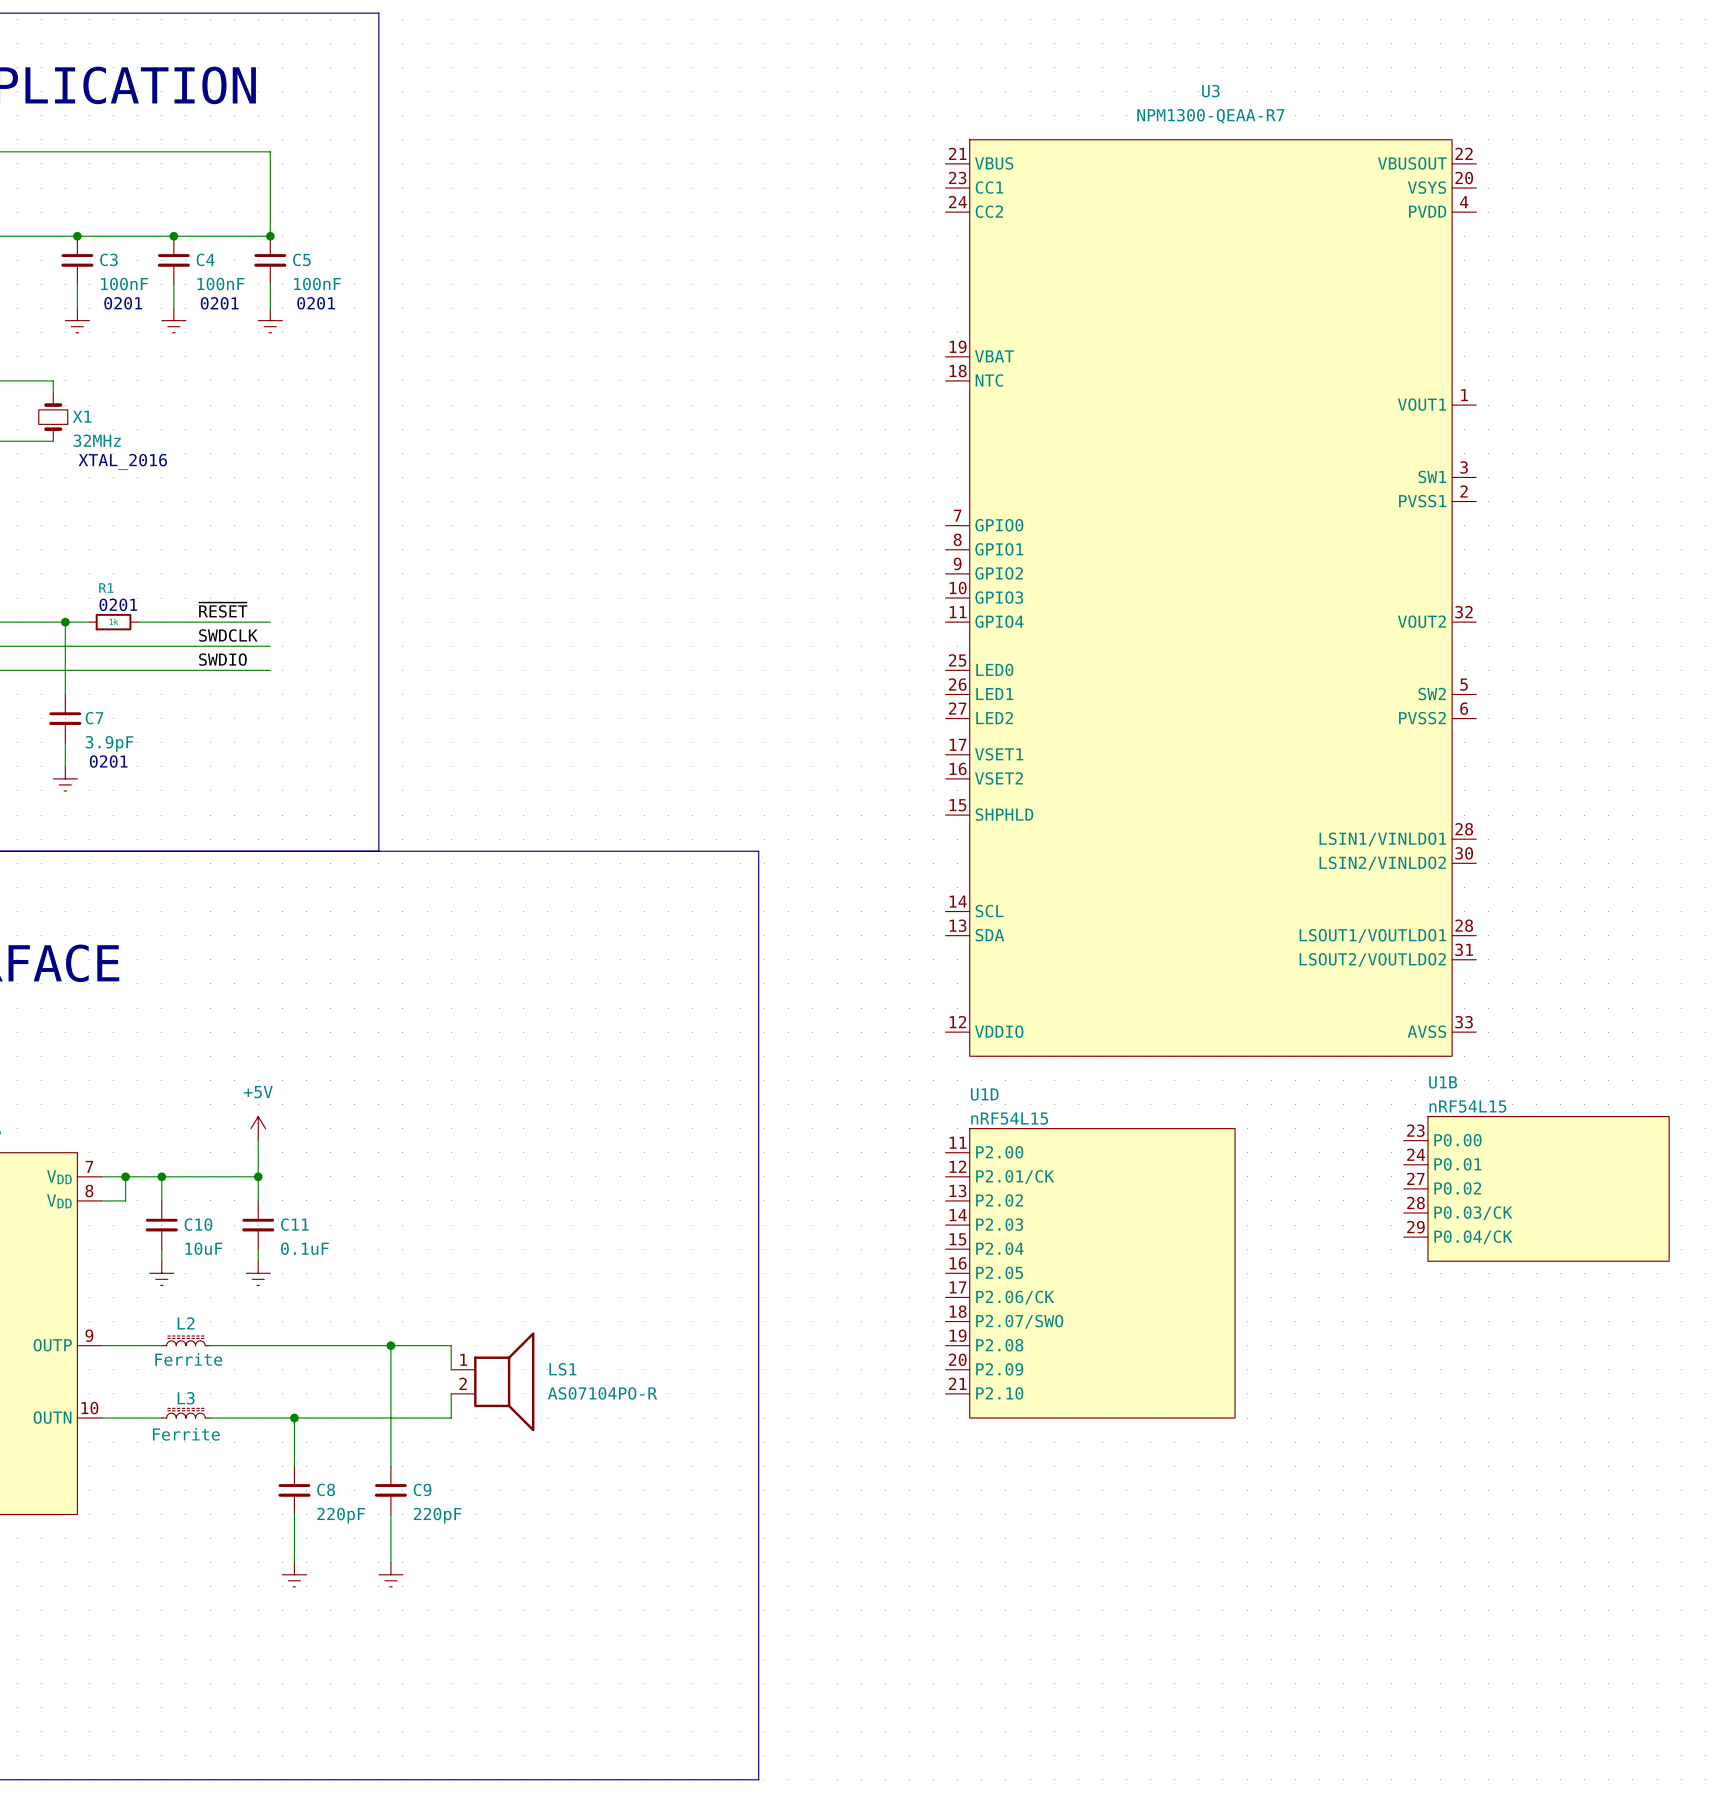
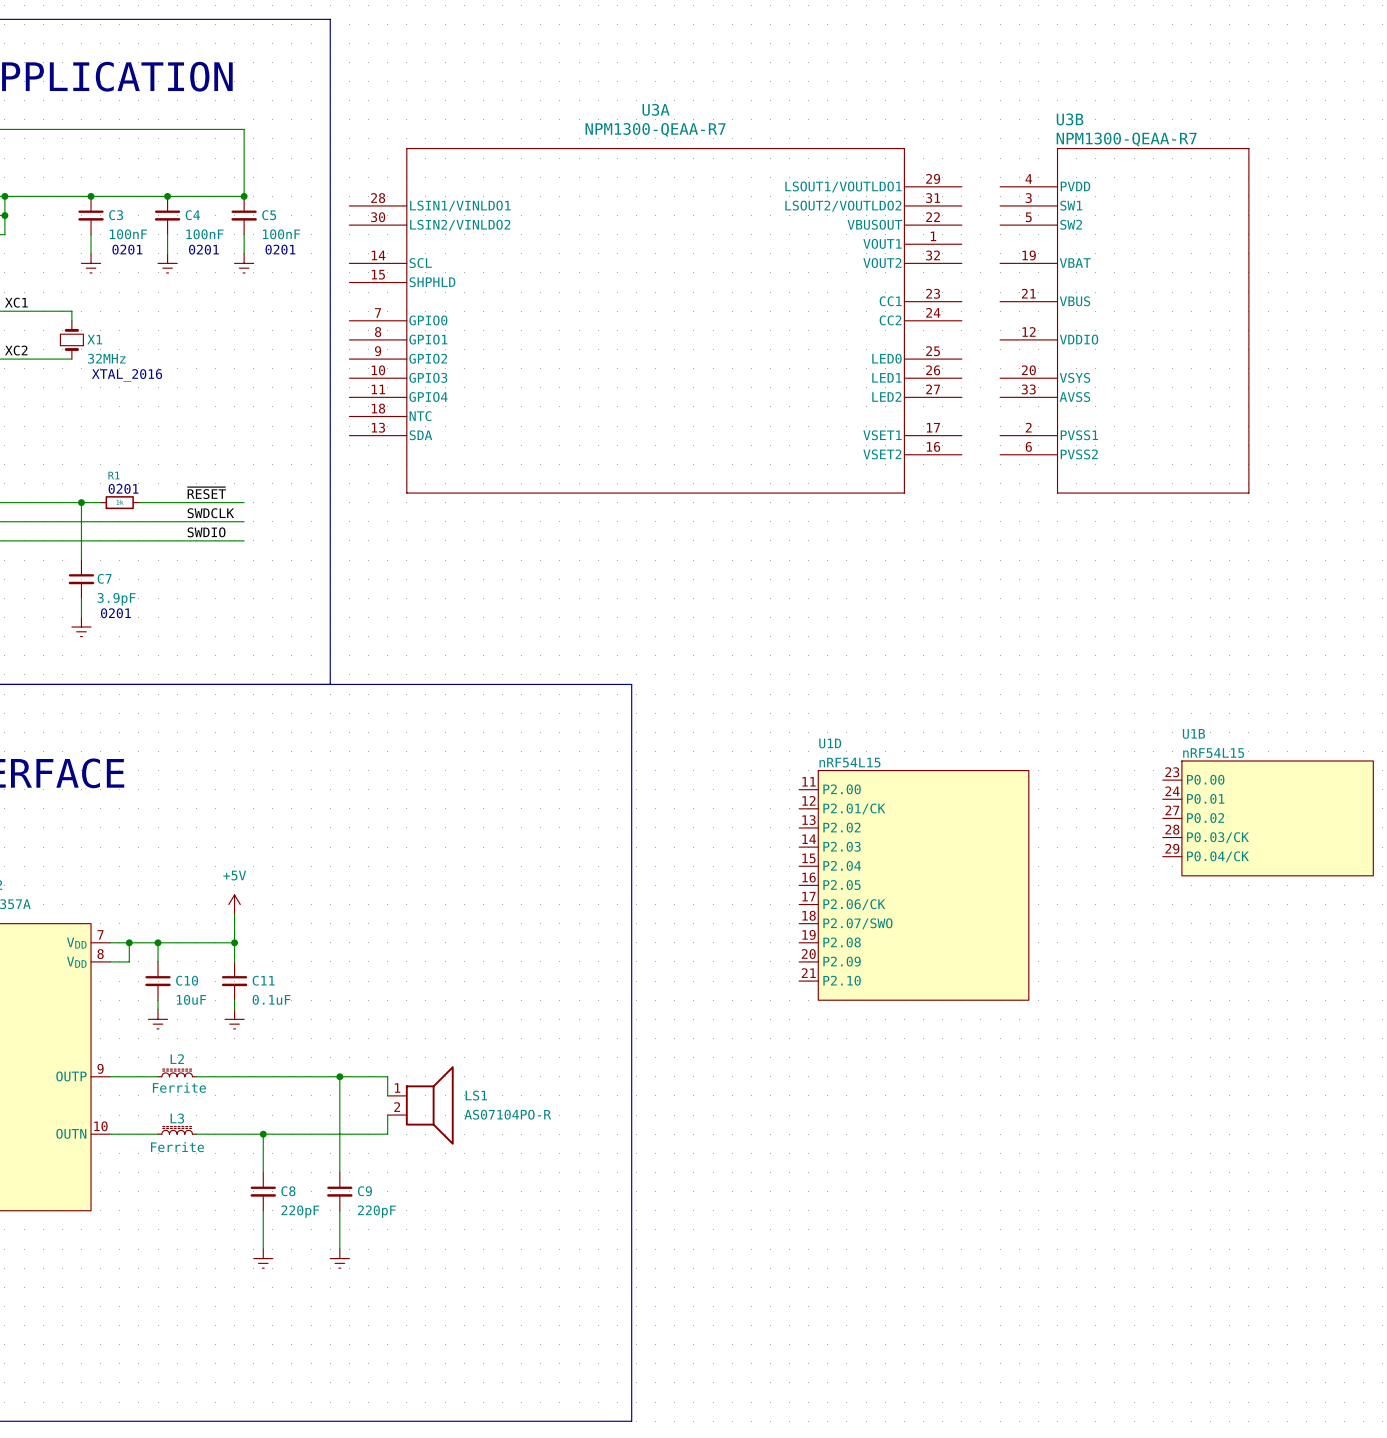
U3A: none -> NPM1300-QEAA-R7 (655, 320)
U3B: none -> NPM1300-QEAA-R7 (1124, 320)
U3: NPM1300-QEAA-R7 (1210, 598) -> none
U1B position: (1536, 1188) -> (1268, 818)
U1D position: (1090, 1273) -> (913, 885)

